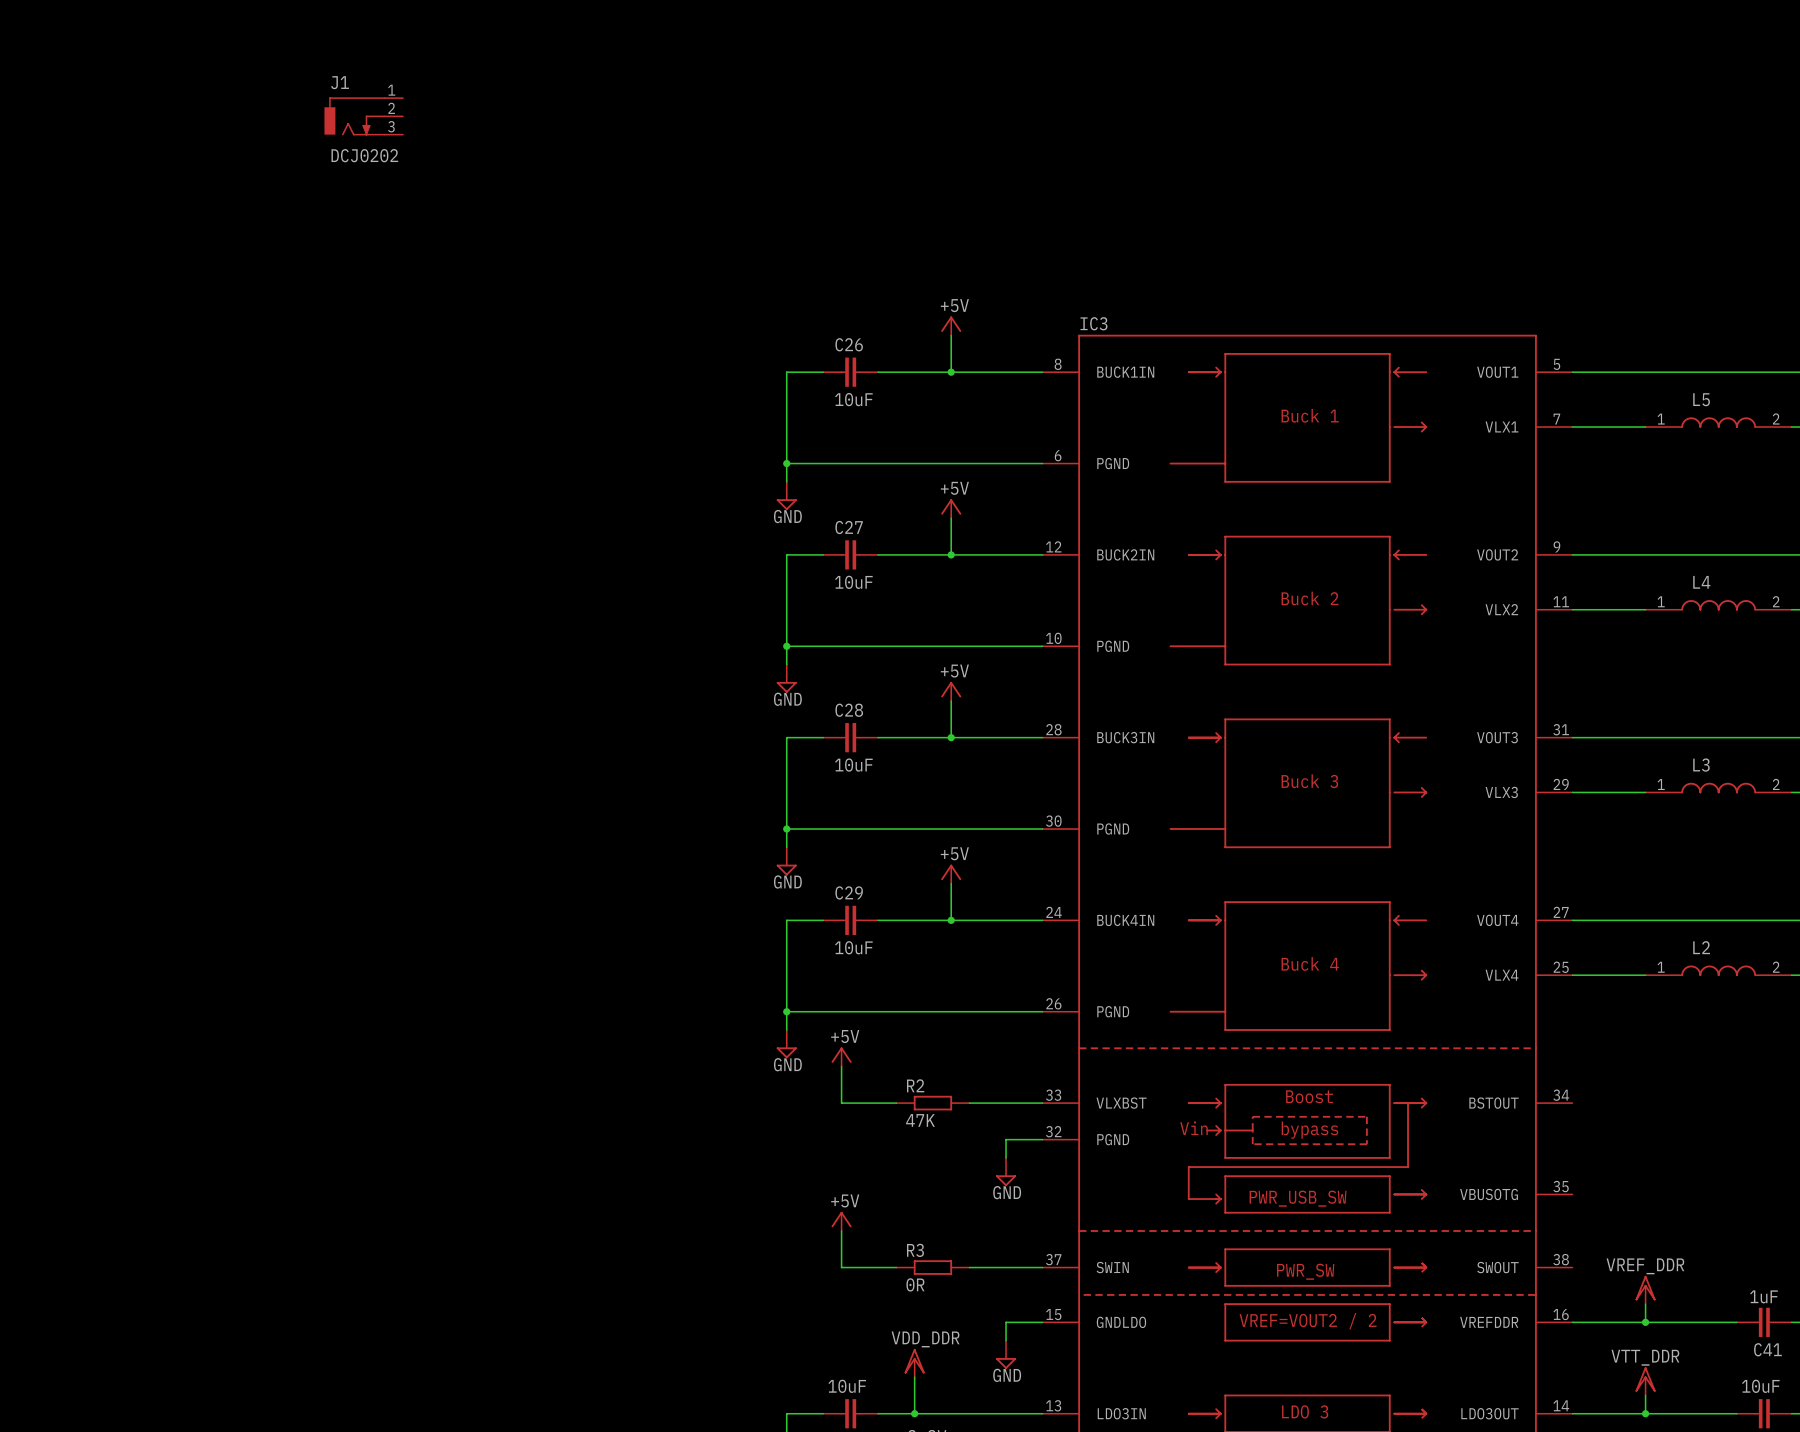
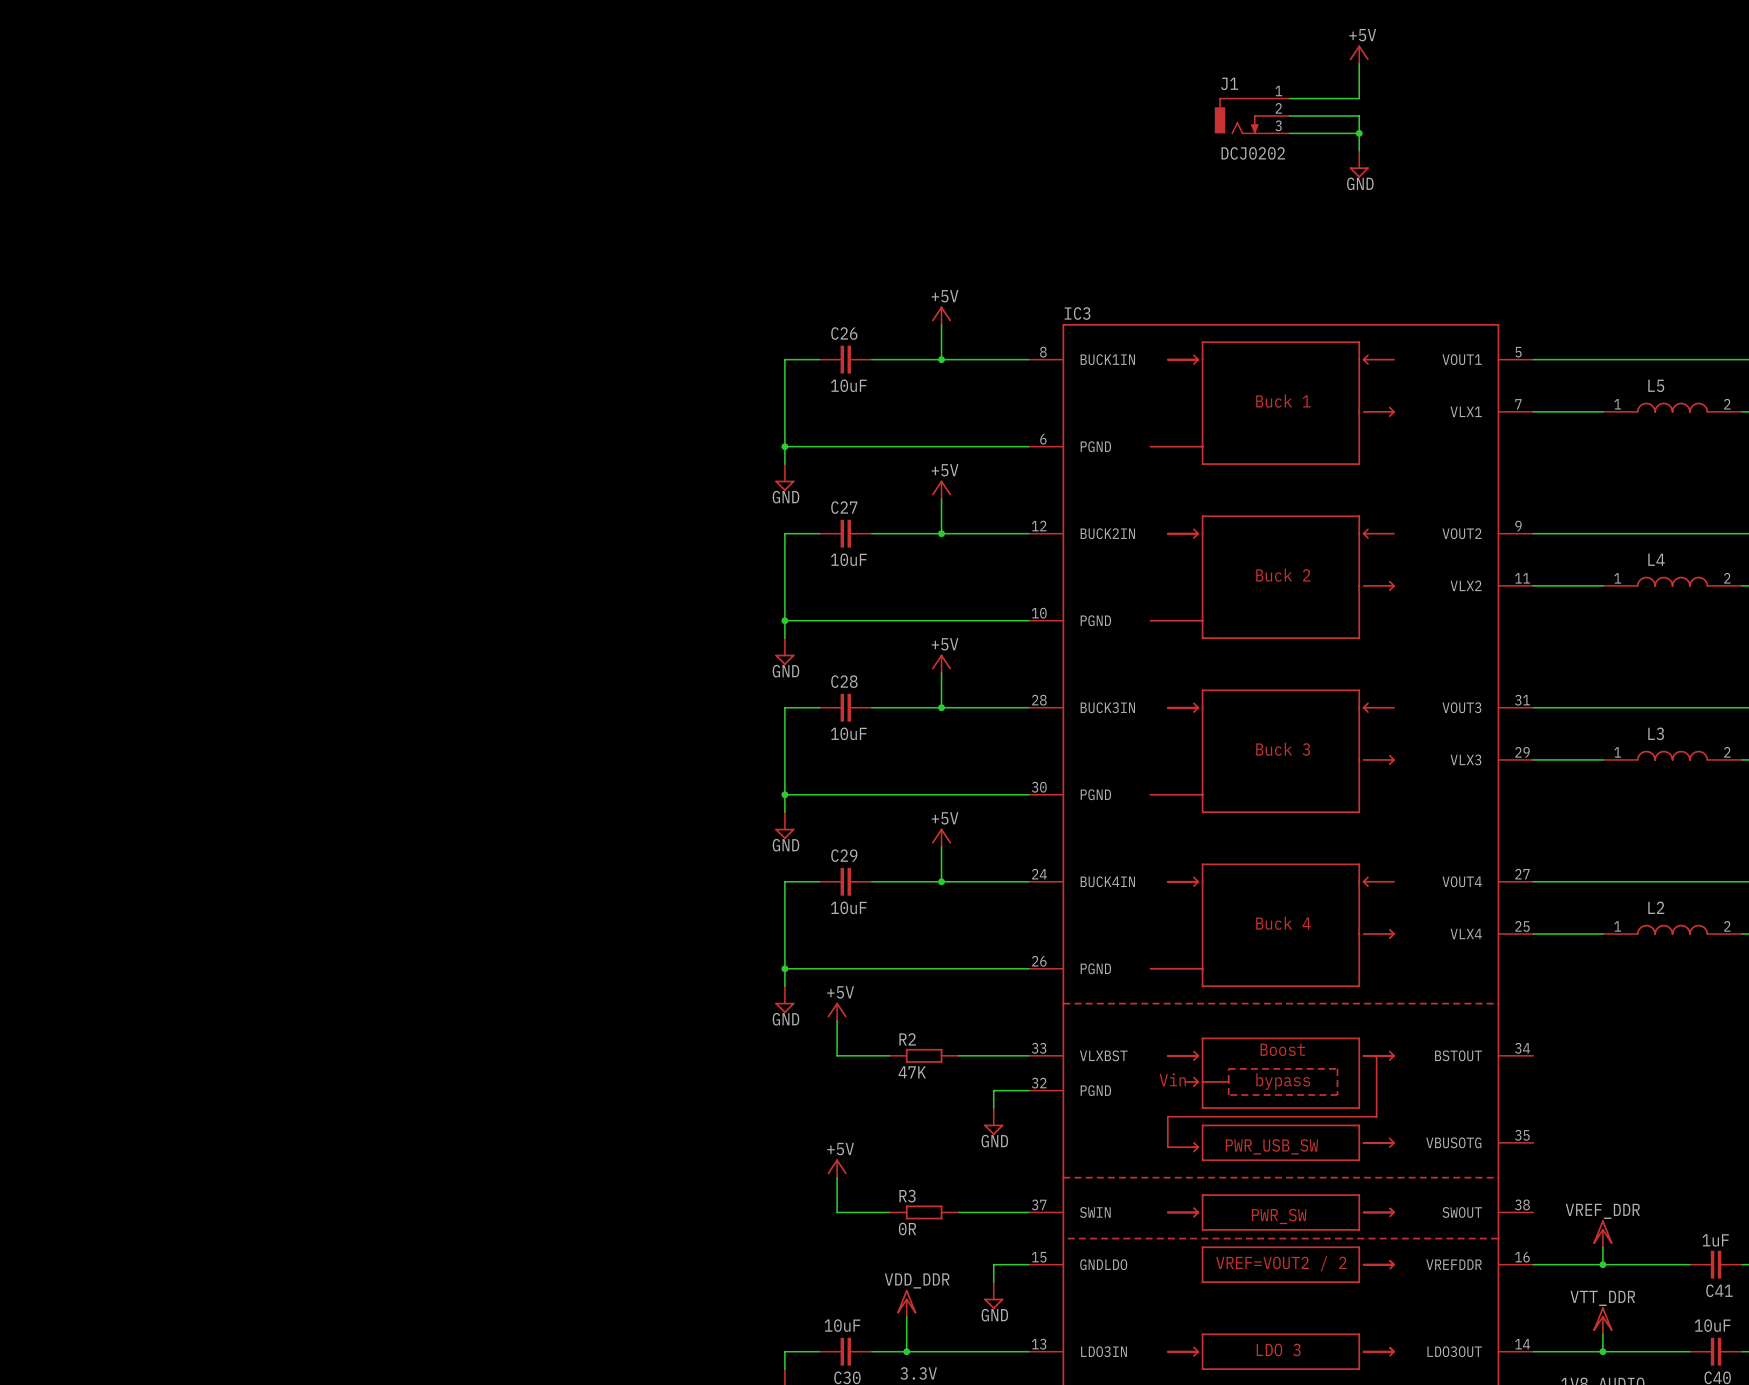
power symbol: none -> +5V (1359, 54)
wire: none -> (1359, 63) (1359, 98) (1289, 98)
J1 position: (363, 116) -> (1252, 115)
wire: none -> (1289, 115) (1359, 115) (1359, 150)
wire: none -> (1289, 133) (1359, 133)
junction: none -> (1359, 133)
power symbol: none -> GND (1359, 164)

